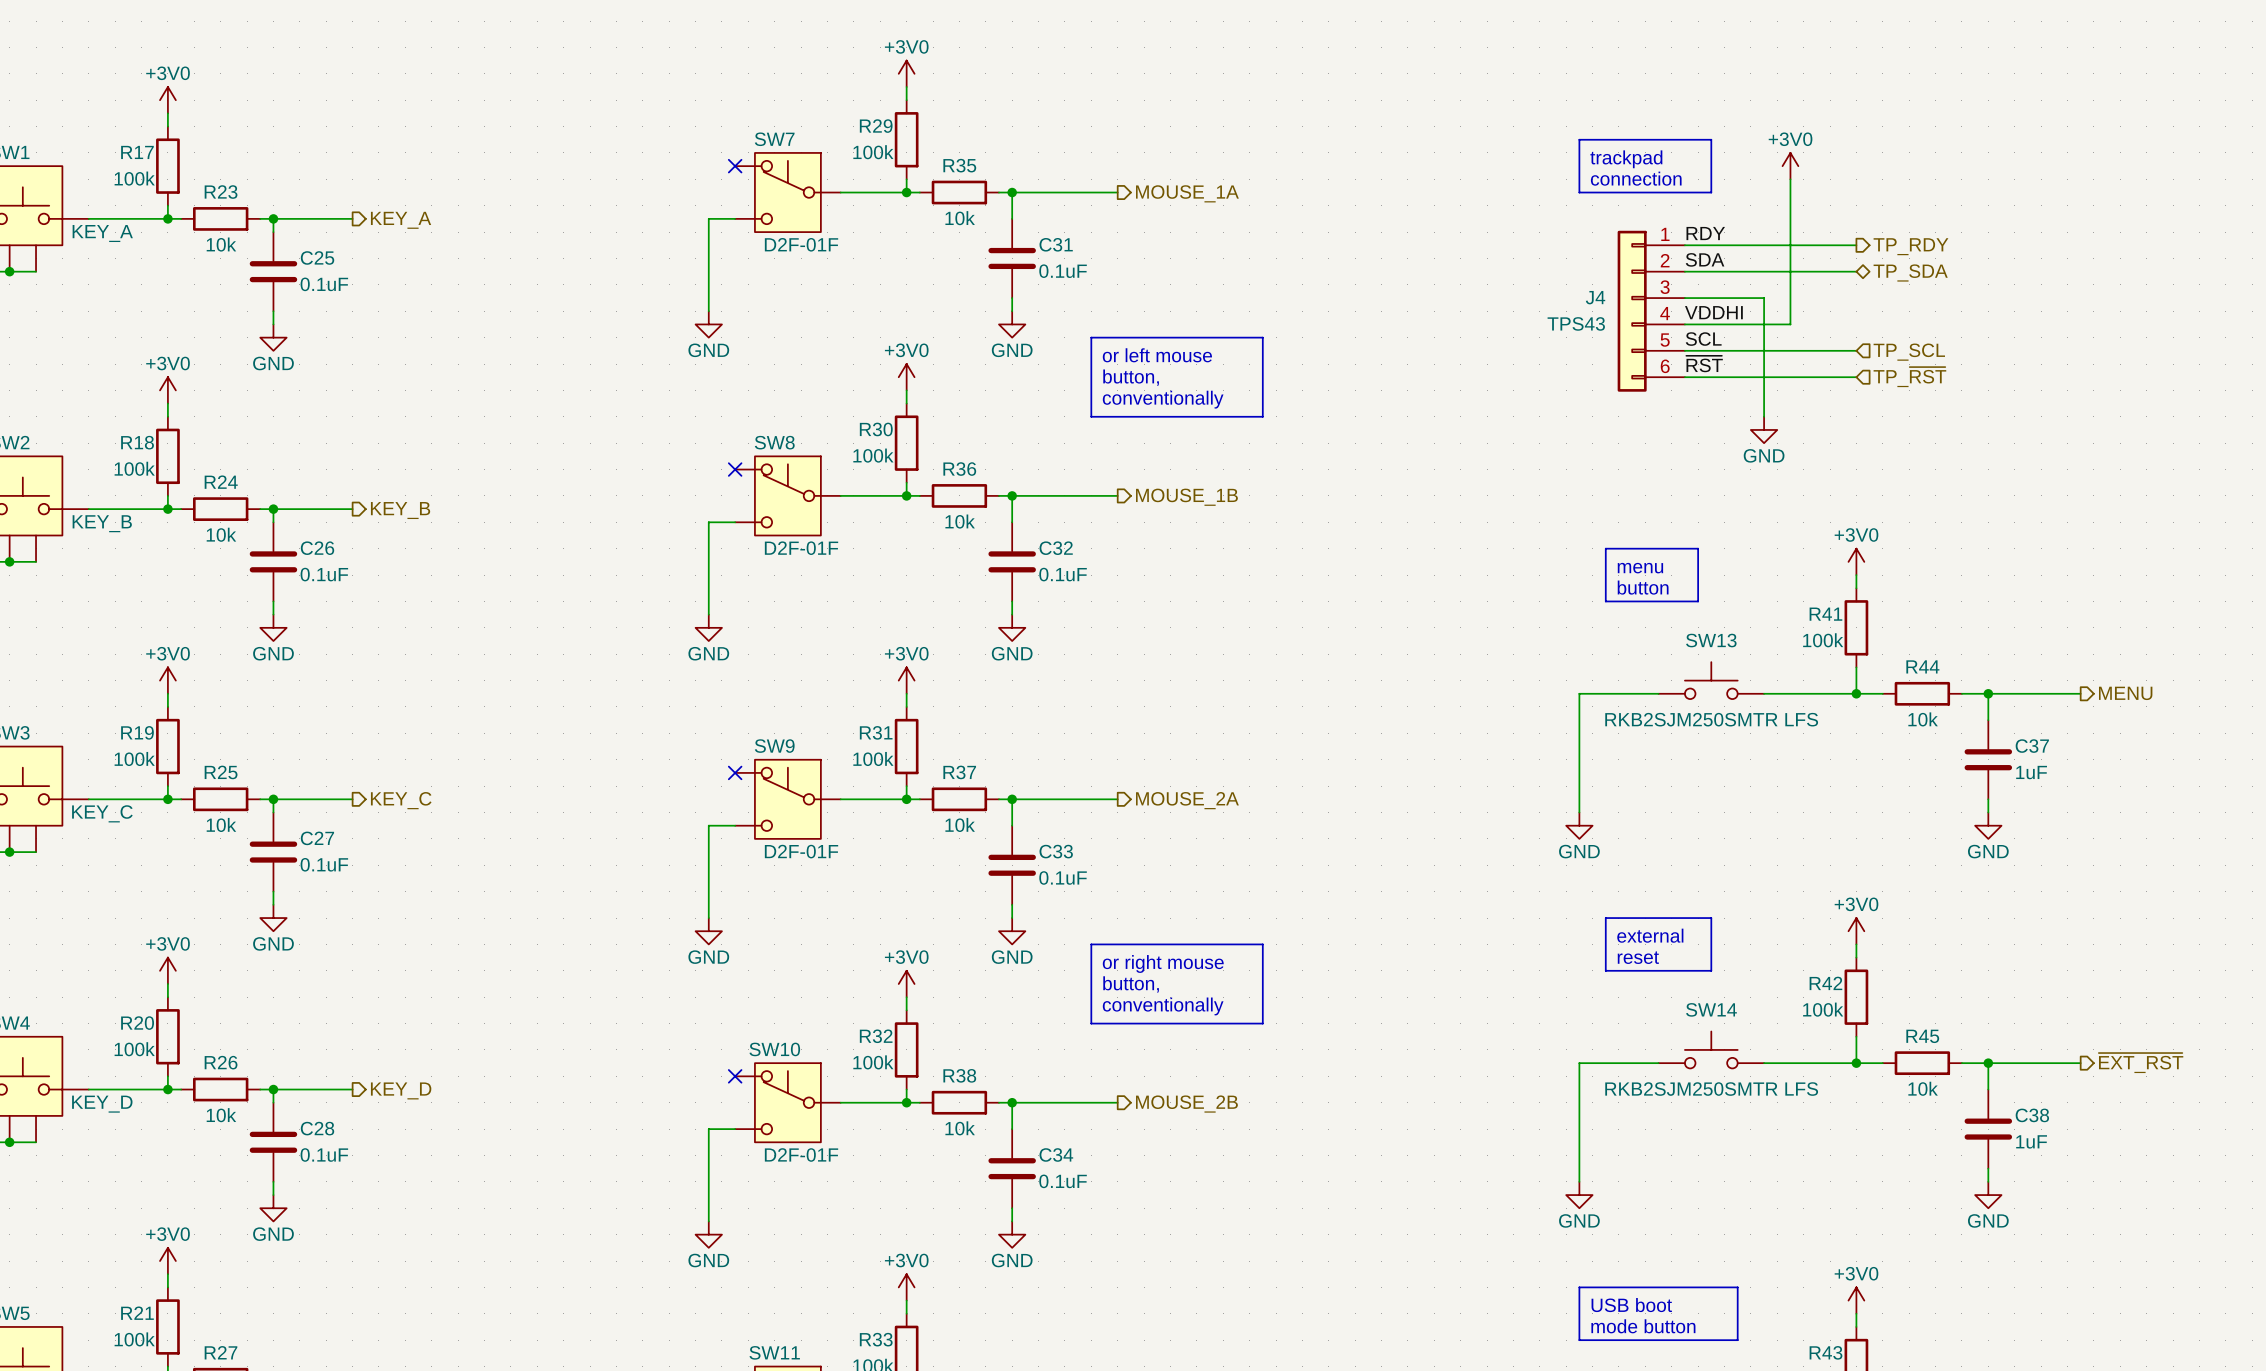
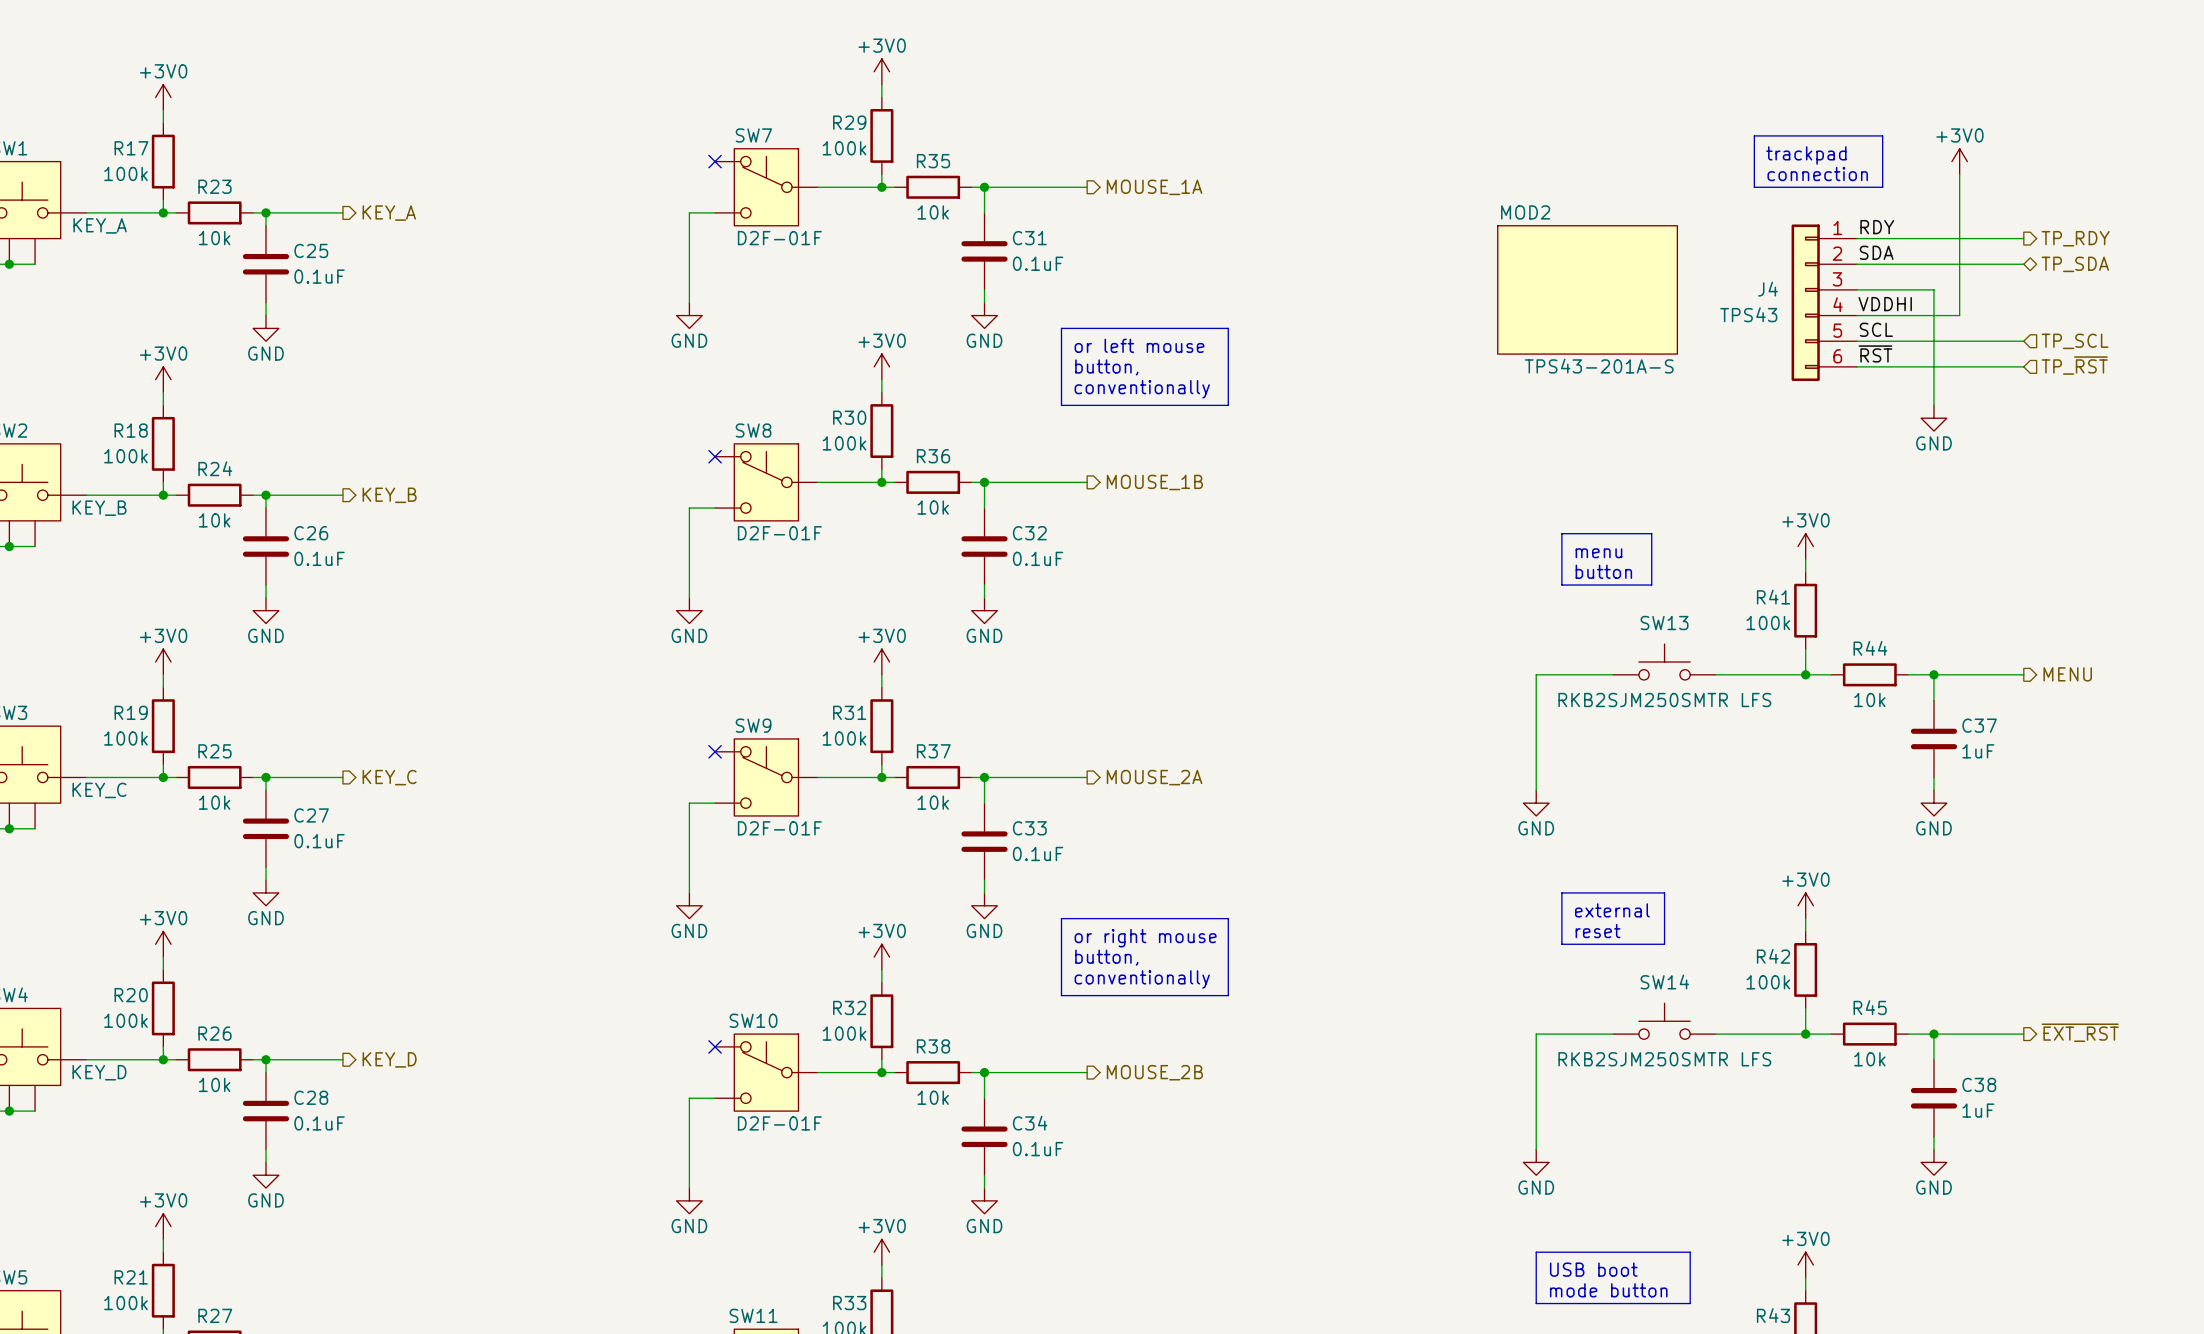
line: (1579, 139) (1711, 139) (1711, 192) (1579, 192) (1579, 139) -> (1754, 135) (1882, 135) (1882, 187) (1754, 187) (1754, 135)
text position: trackpad (1626, 159) -> trackpad (1806, 155)
power symbol position: +3V0 (1790, 166) -> +3V0 (1959, 161)
text position: connection (1636, 178) -> connection (1817, 174)
wire: (1790, 179) (1790, 324) (1684, 324) -> (1959, 174) (1959, 315) (1857, 315)
label position: RDY (1705, 233) -> RDY (1877, 227)
wire: (1684, 245) (1856, 245) -> (1857, 238) (2023, 238)
hierarchical label position: TP_RDY (1910, 246) -> TP_RDY (2075, 238)
label position: SDA (1705, 259) -> SDA (1876, 252)
wire: (1684, 271) (1856, 271) -> (1857, 264) (2023, 264)
hierarchical label position: TP_SDA (1910, 272) -> TP_SDA (2075, 264)
MOD2: none -> TPS43-201A-S (1587, 289)
wire: (1684, 298) (1764, 298) (1764, 416) -> (1857, 289) (1933, 289) (1933, 405)
J4 position: (1651, 311) -> (1824, 302)
label position: VDDHI (1713, 312) -> VDDHI (1885, 304)
label position: SCL (1703, 339) -> SCL (1876, 329)
wire: (1684, 350) (1856, 350) -> (1857, 341) (2023, 341)
hierarchical label position: TP_SCL (1909, 352) -> TP_SCL (2075, 341)
label position: ~{RST} (1704, 364) -> ~{RST} (1875, 353)
wire: (1684, 377) (1856, 377) -> (1857, 366) (2023, 366)
hierarchical label position: TP_~{RST} (1909, 377) -> TP_~{RST} (2074, 365)
power symbol position: GND (1764, 429) -> GND (1933, 418)

